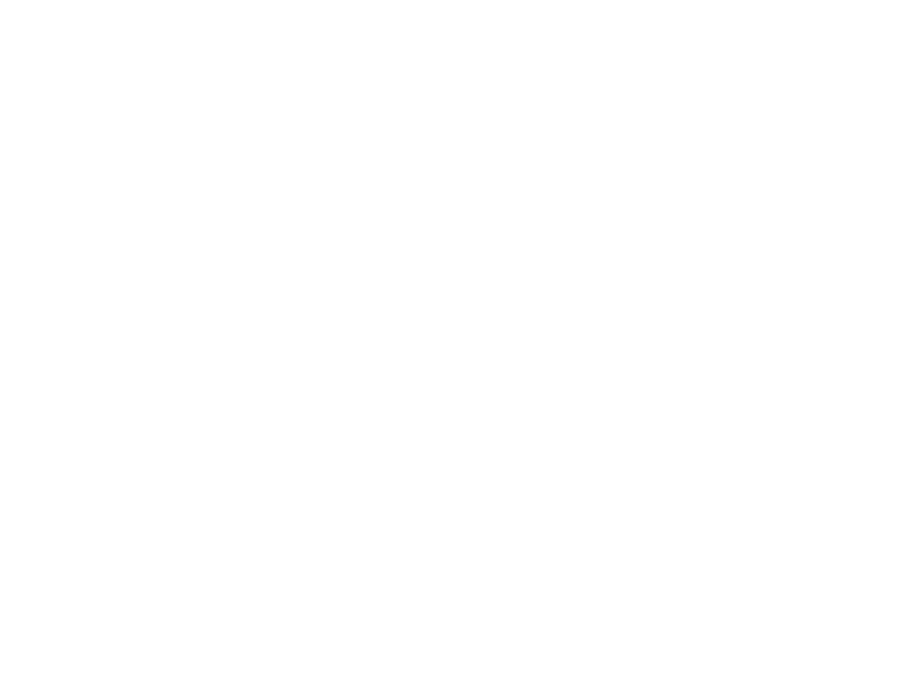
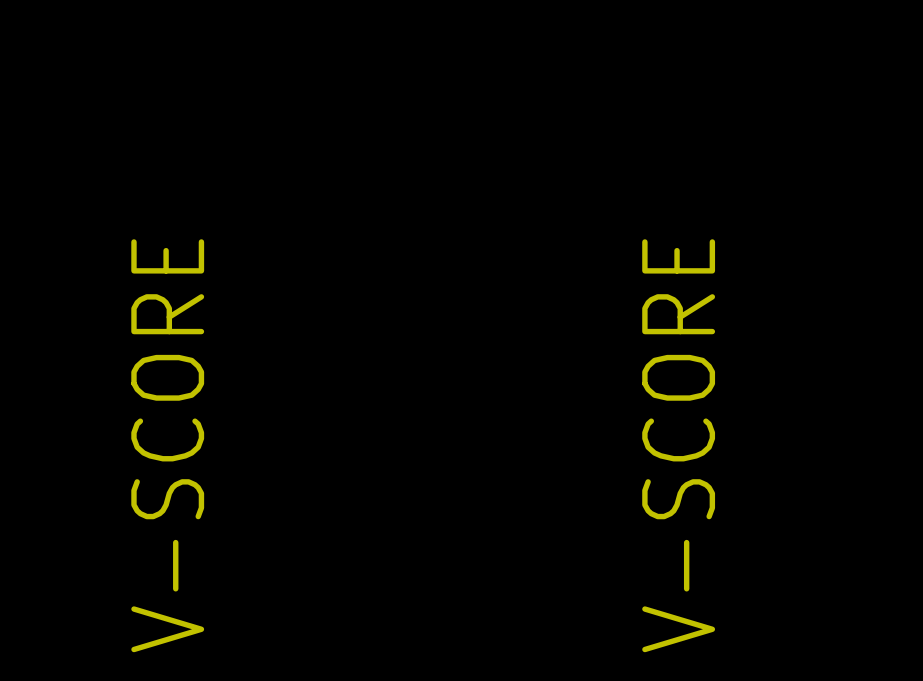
text: none -> V-SCORE (167, 445)
text: none -> V-SCORE (678, 445)

